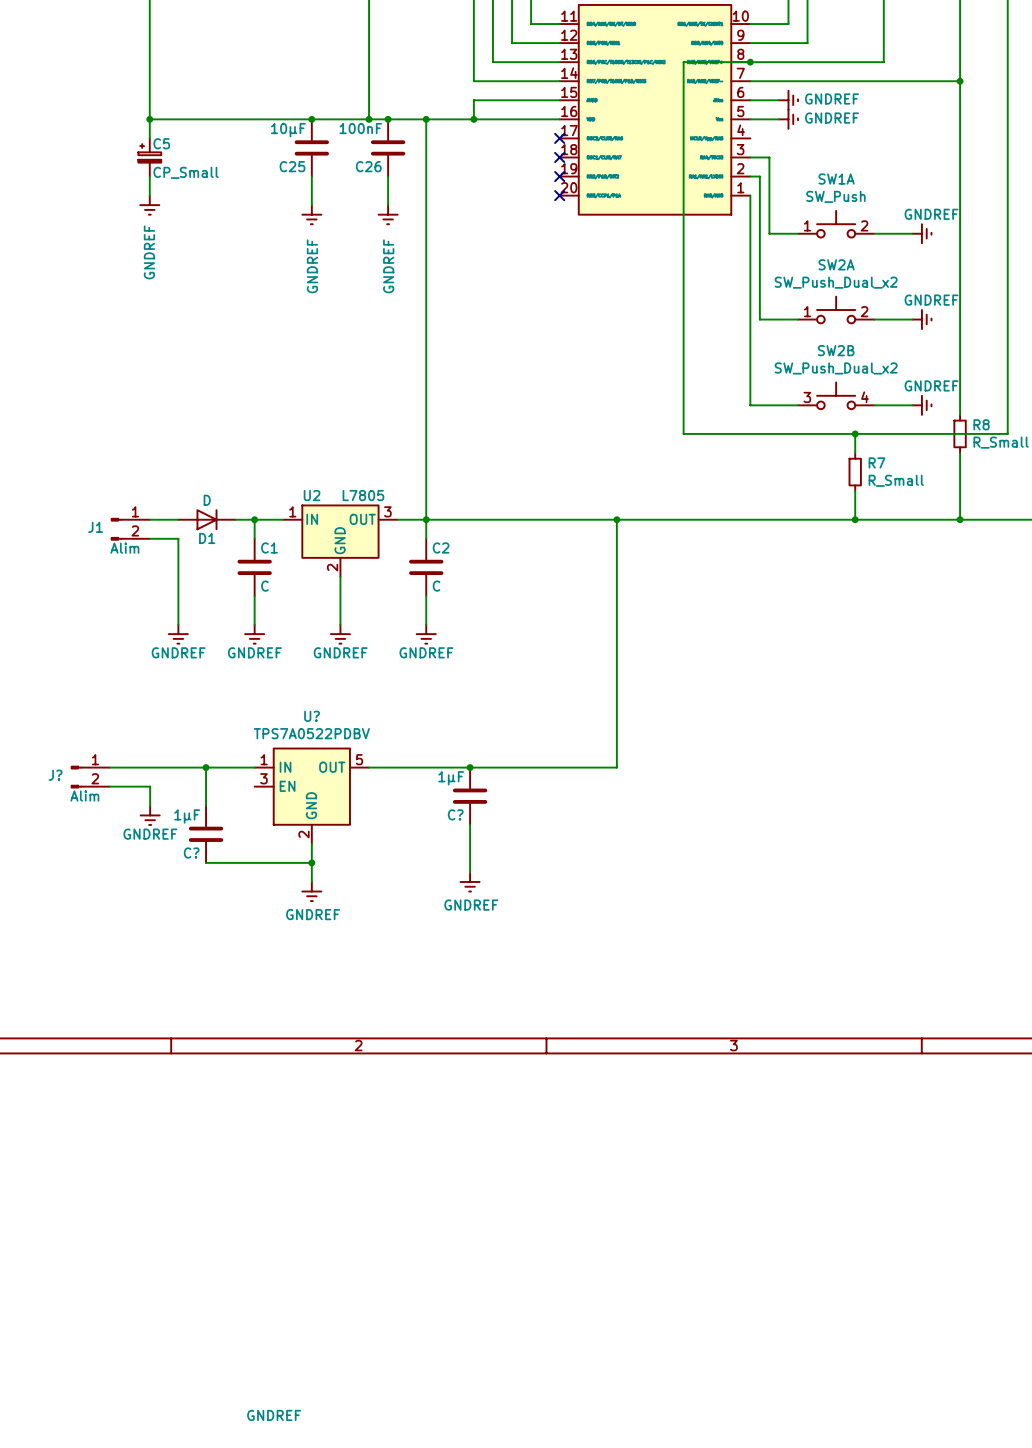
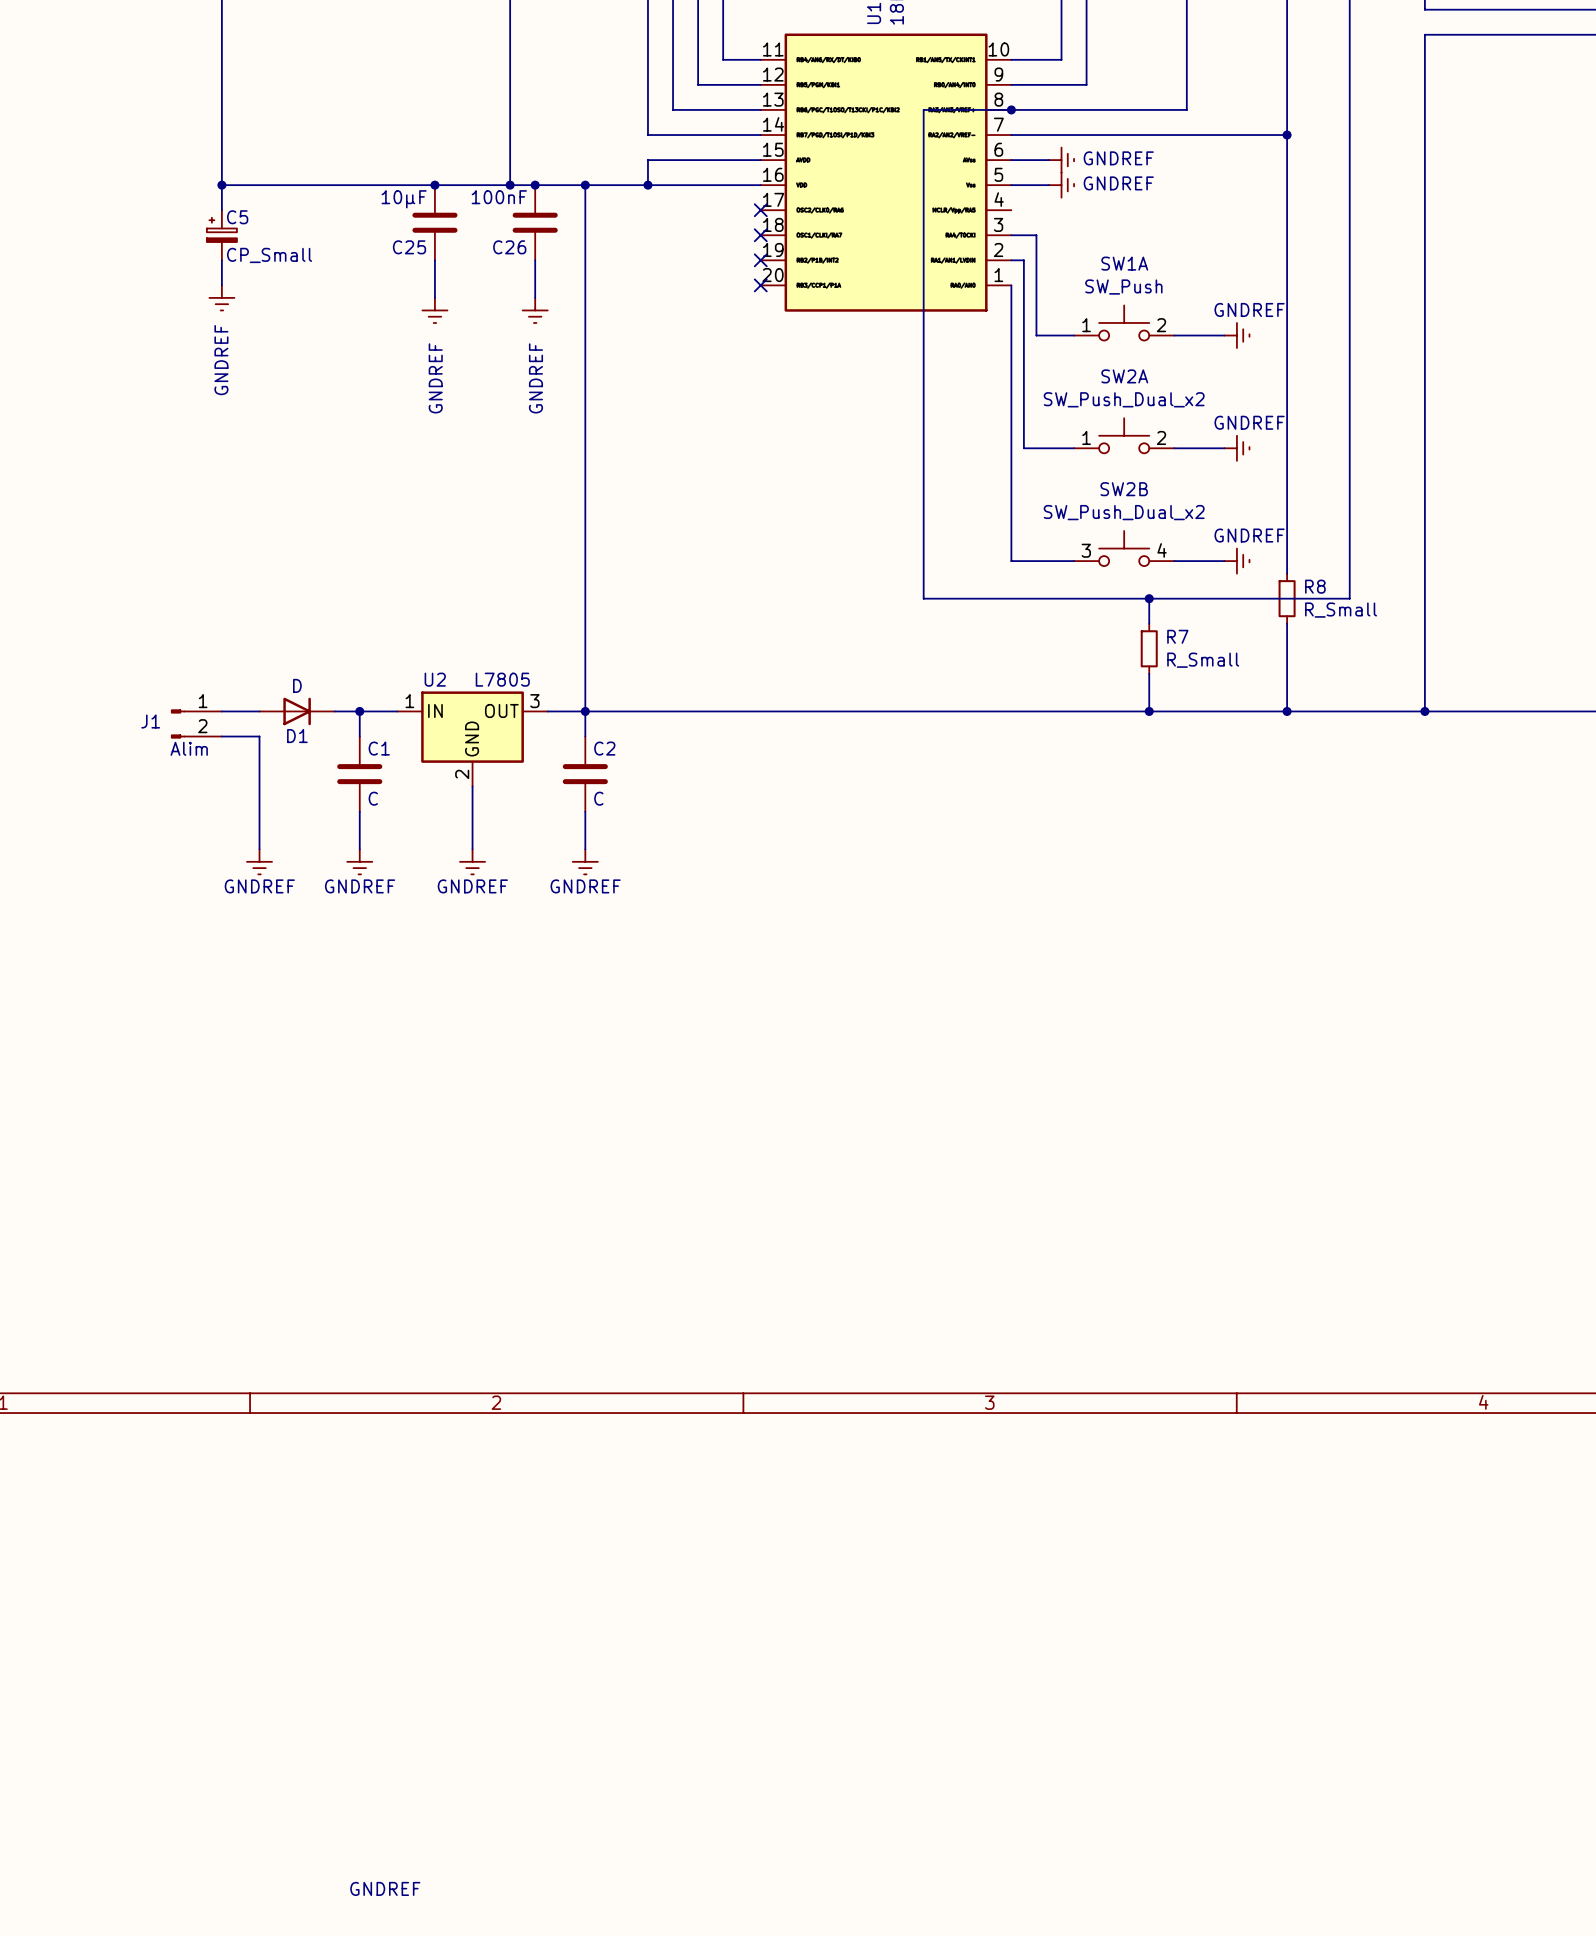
wire: (616, 519) (616, 767) (369, 767) -> none
junction: (616, 519) -> none
wire: (109, 767) (254, 767) -> none
wire: (206, 767) (206, 805) -> none
junction: (206, 767) -> none
junction: (470, 767) -> none
J?: Alim (90, 777) -> none
wire: (109, 786) (150, 786) (150, 805) -> none
U?: TPS7A0522PDBV (311, 795) -> none
C?: 1µF (470, 796) -> none
power symbol: GNDREF (150, 815) -> none
wire: (470, 824) (470, 872) -> none
C?: 1µF (206, 834) -> none
wire: (311, 843) (311, 881) -> none
wire: (206, 862) (311, 862) -> none
junction: (311, 862) -> none
power symbol: GNDREF (470, 881) -> none
power symbol: GNDREF (311, 891) -> none

